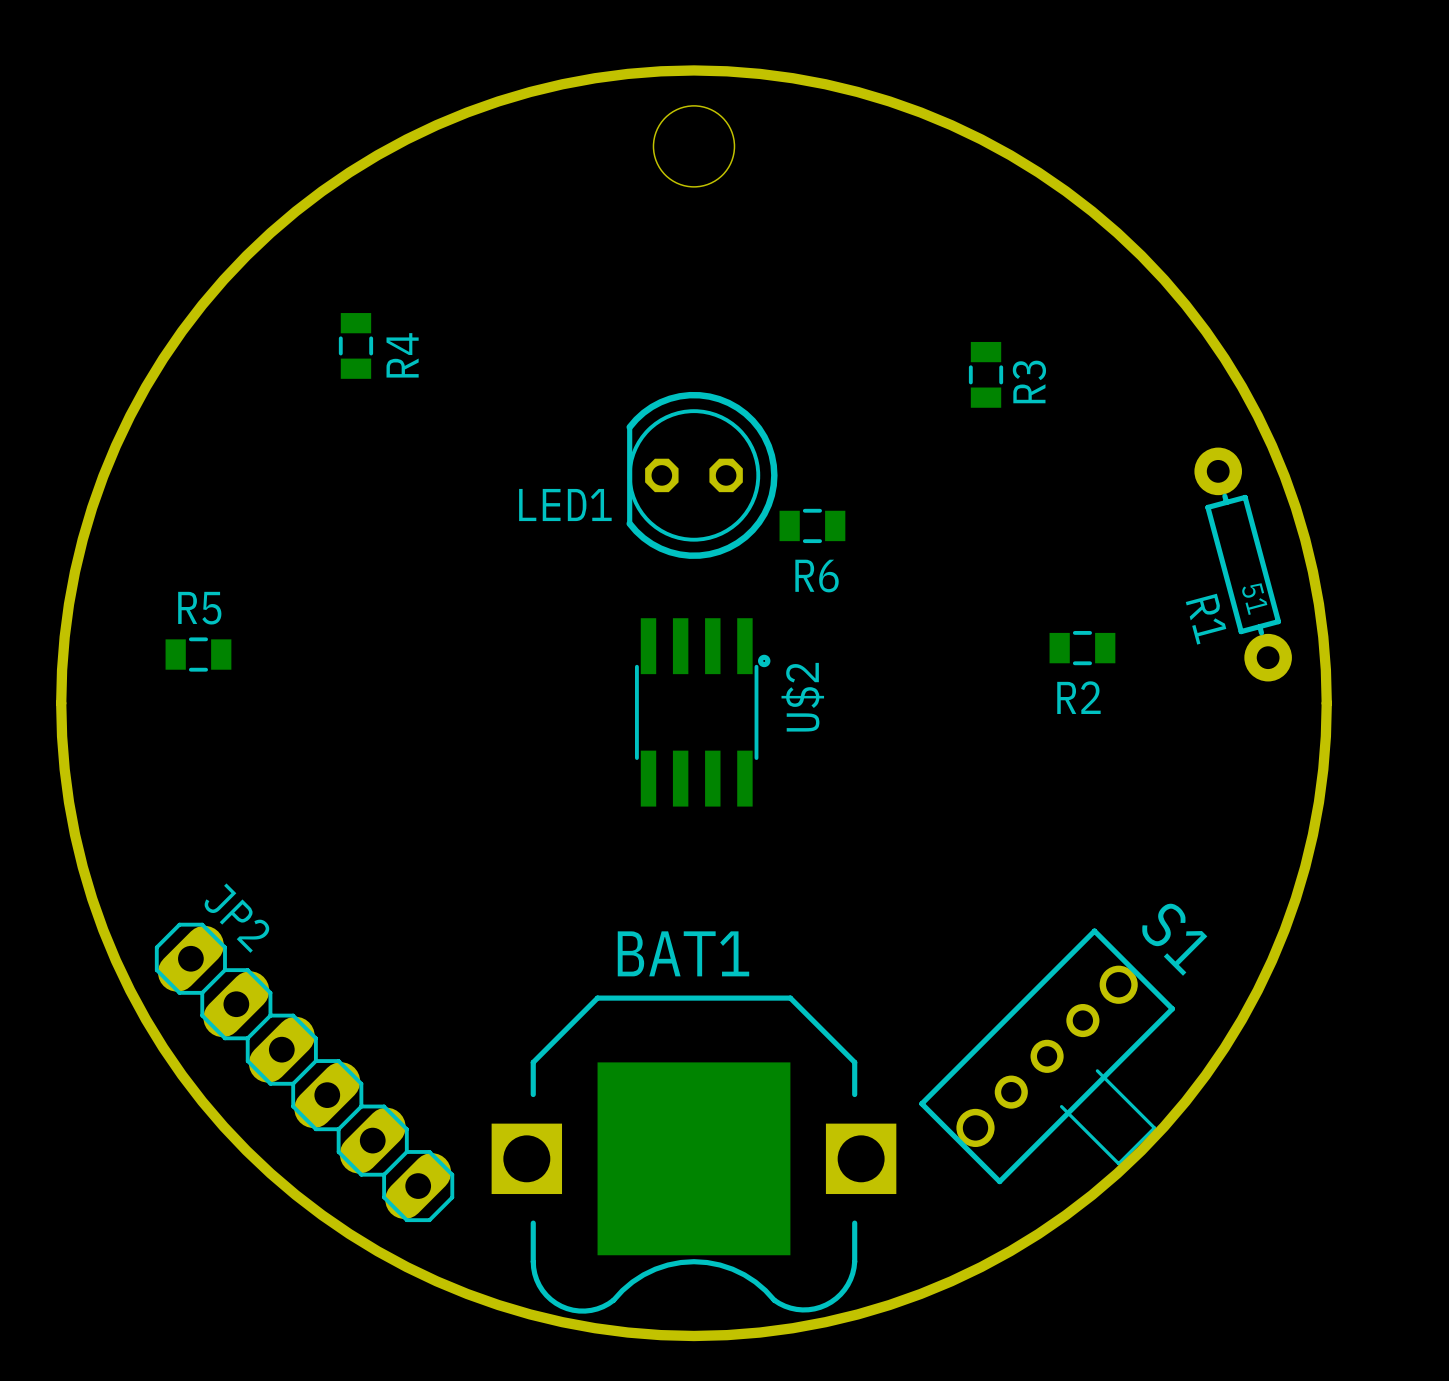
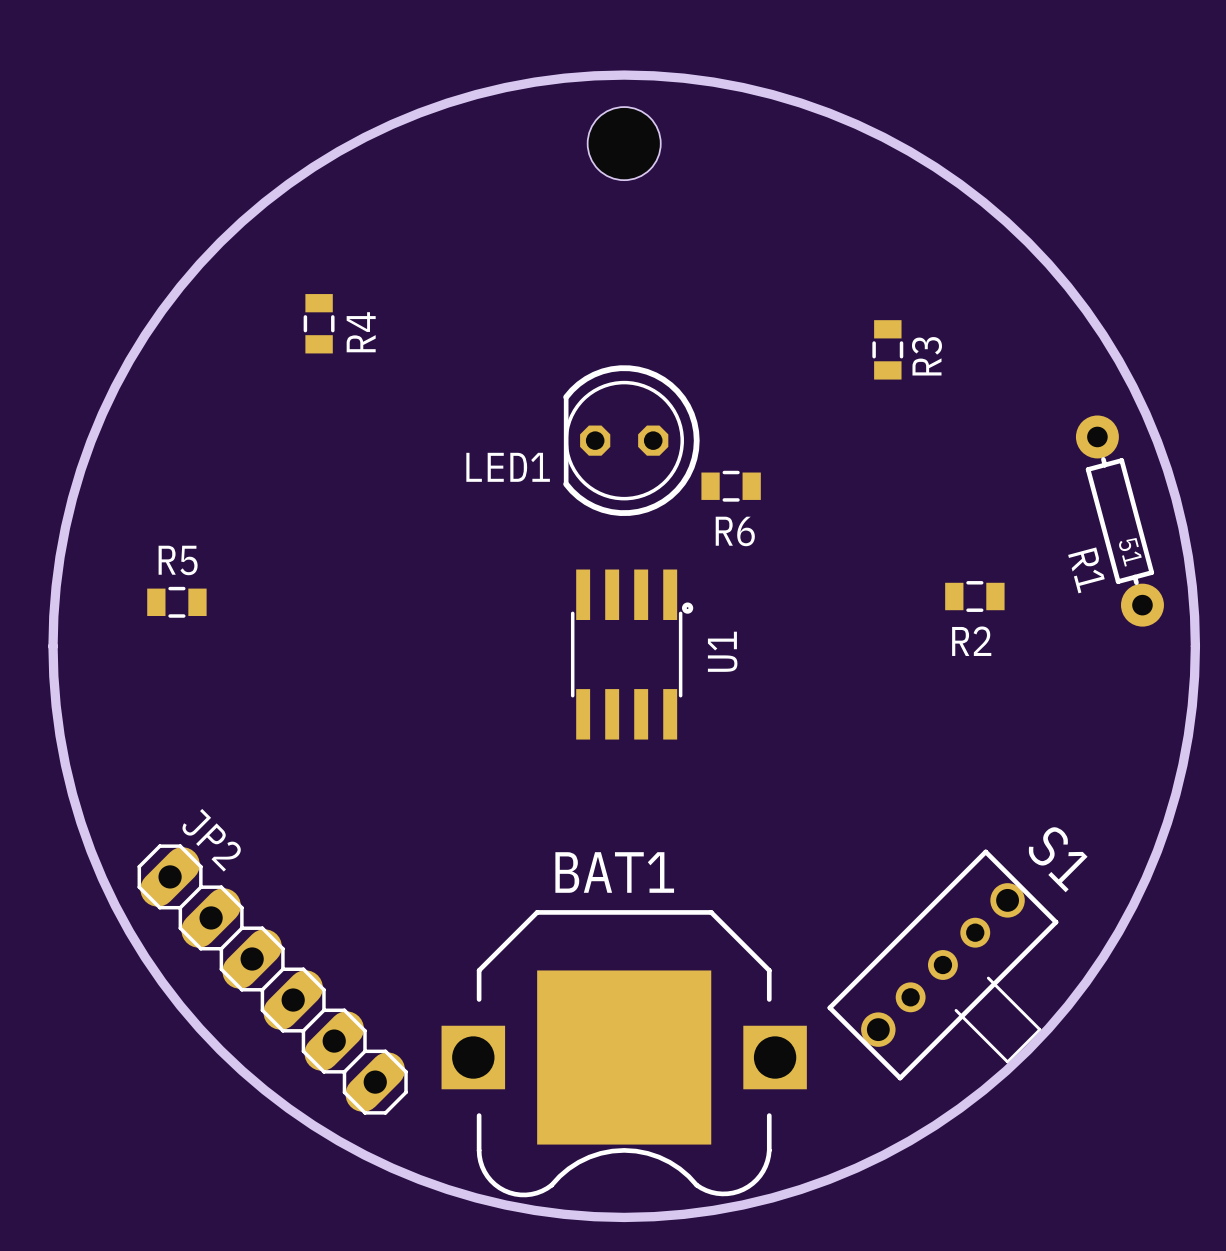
U$2 name: U$2 (802, 697) -> U1 (722, 651)

